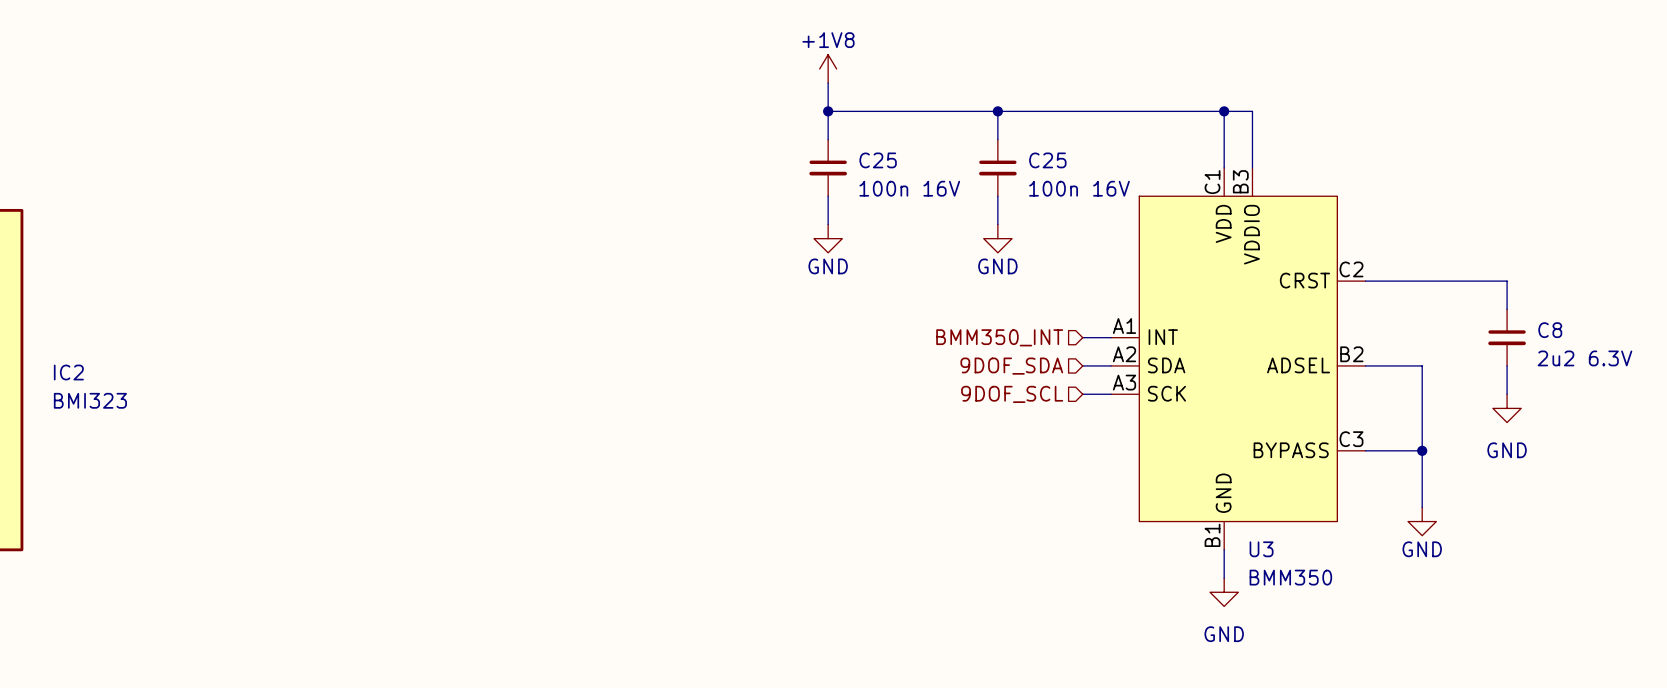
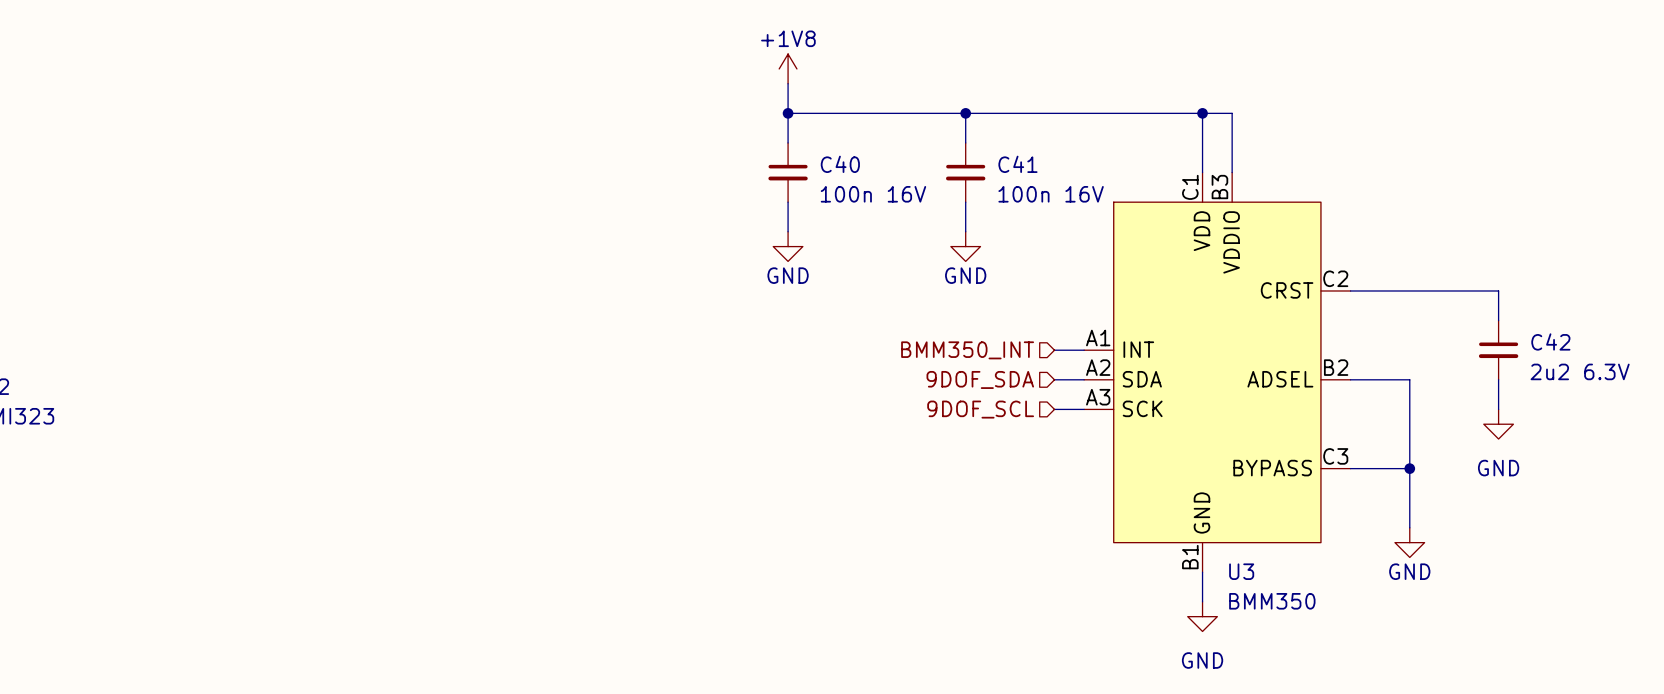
C25 name: C25 (878, 160) -> C40 (840, 164)
C25 name: C25 (1047, 160) -> C41 (1017, 164)
C8 name: C8 (1550, 330) -> C42 (1550, 341)

